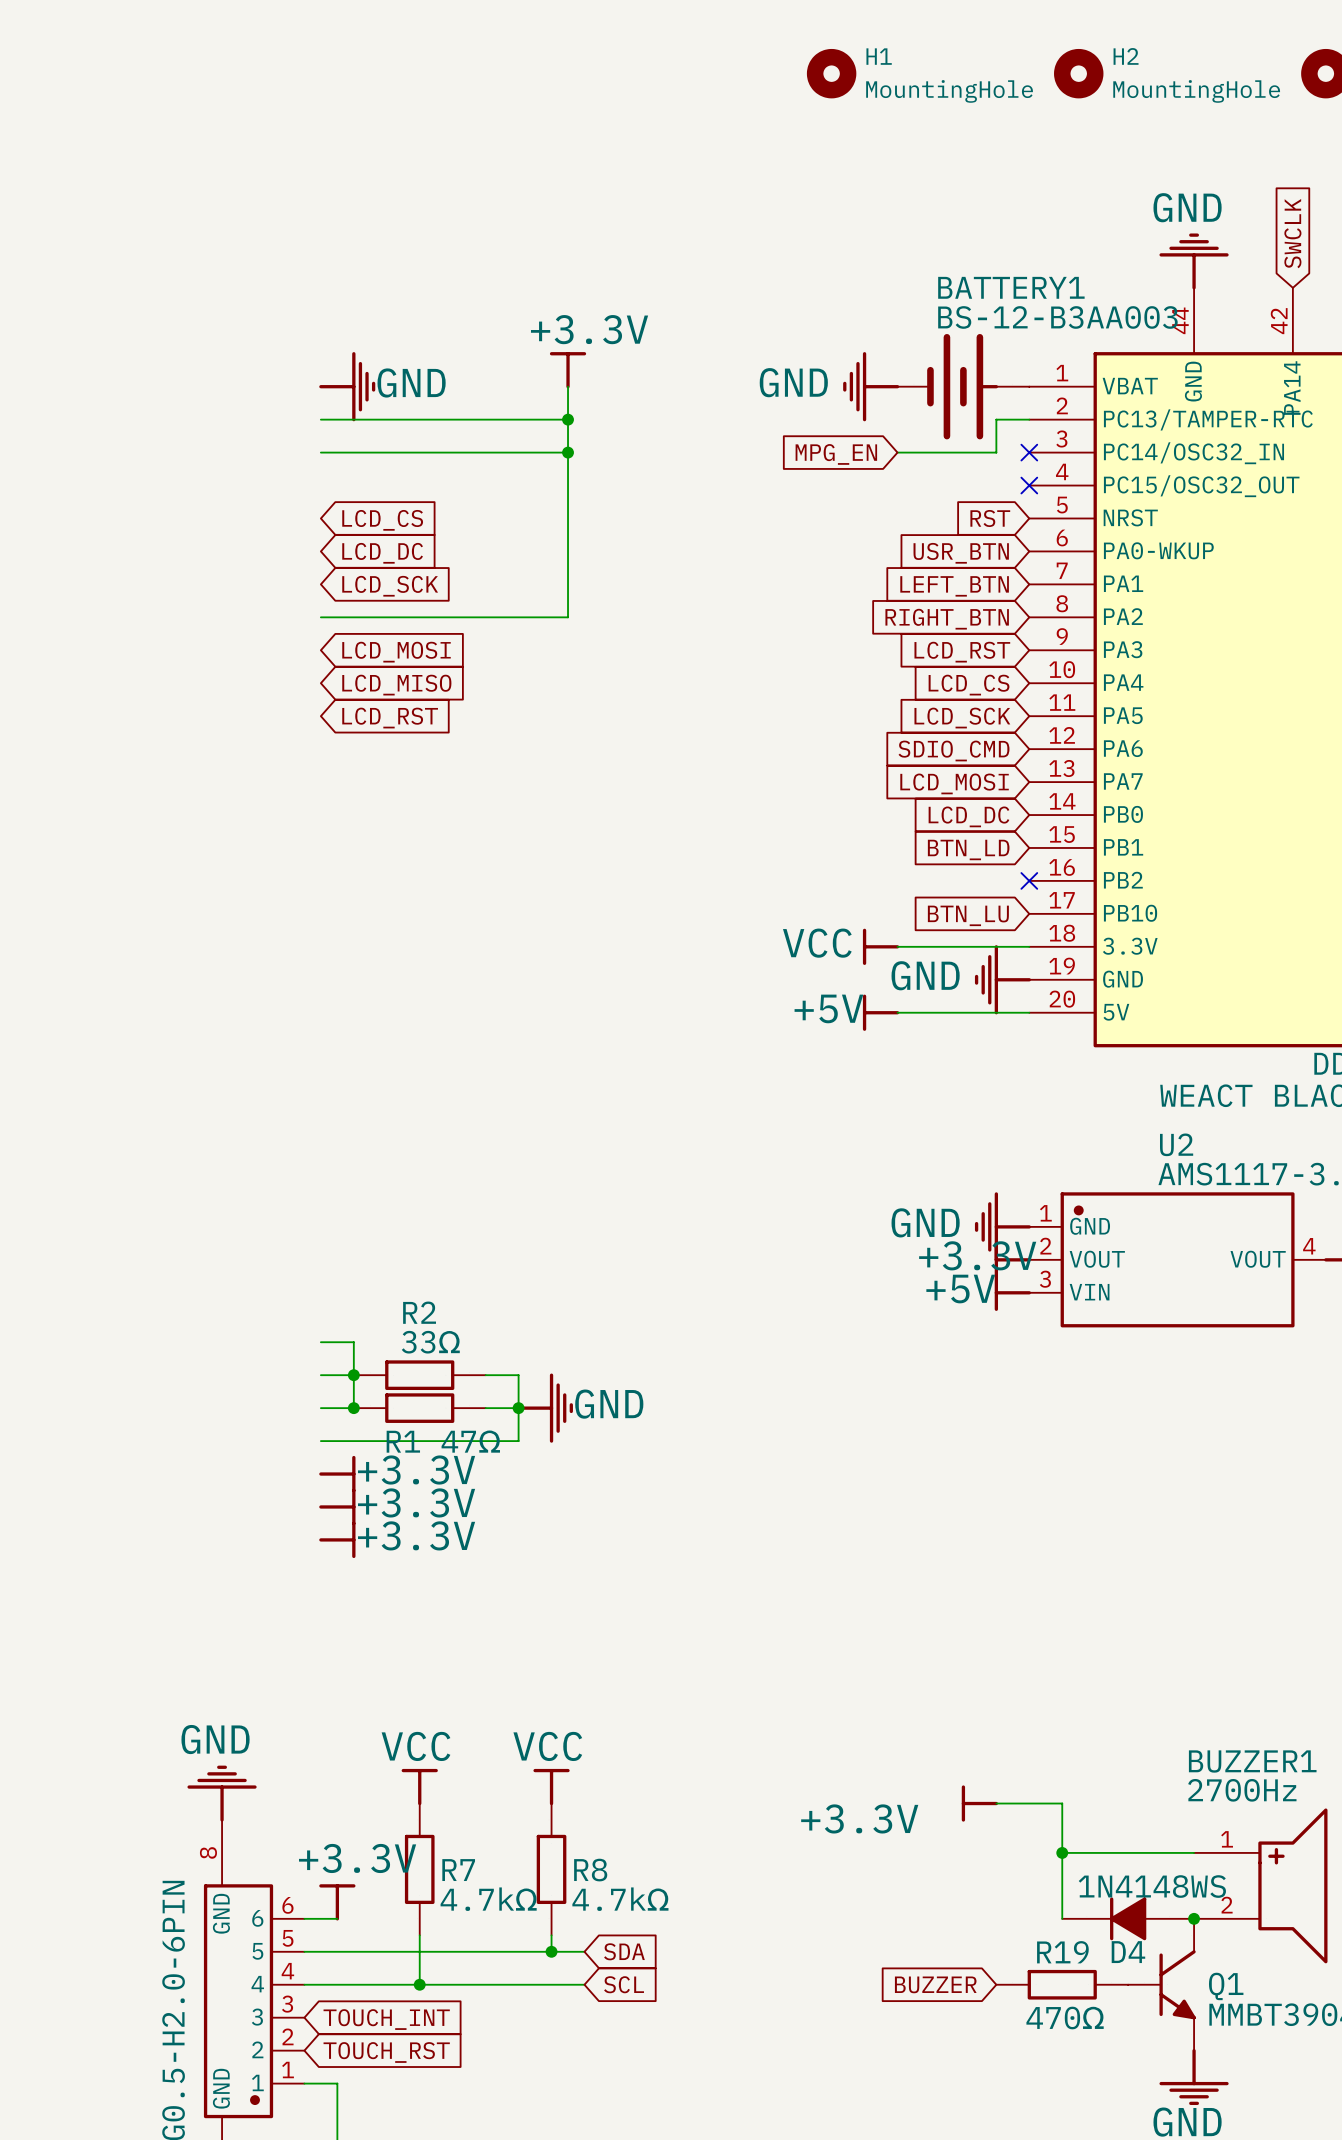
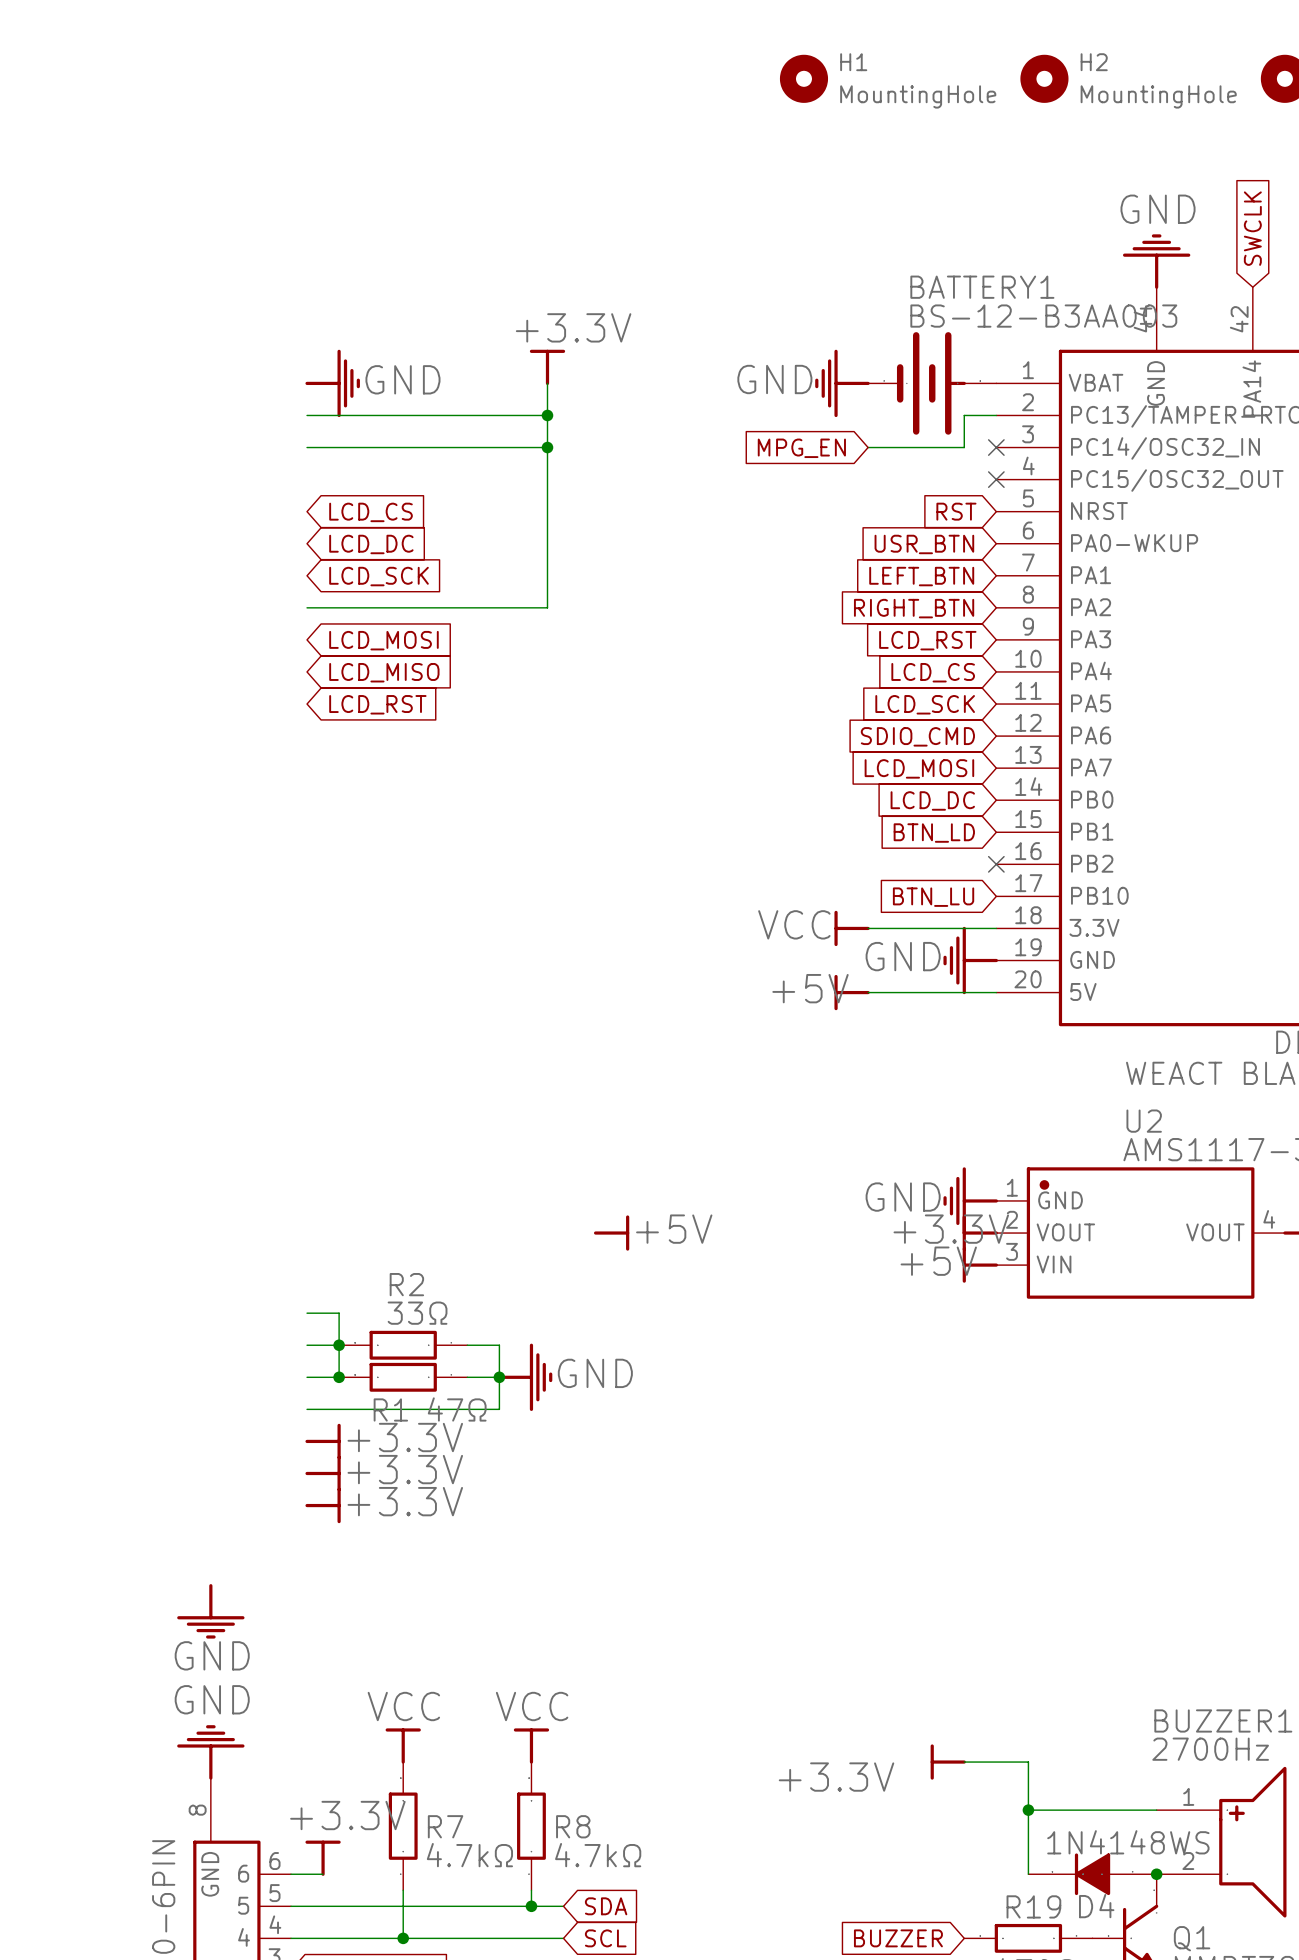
power symbol: none -> +5V (611, 1233)
power symbol: none -> GND (210, 1611)

